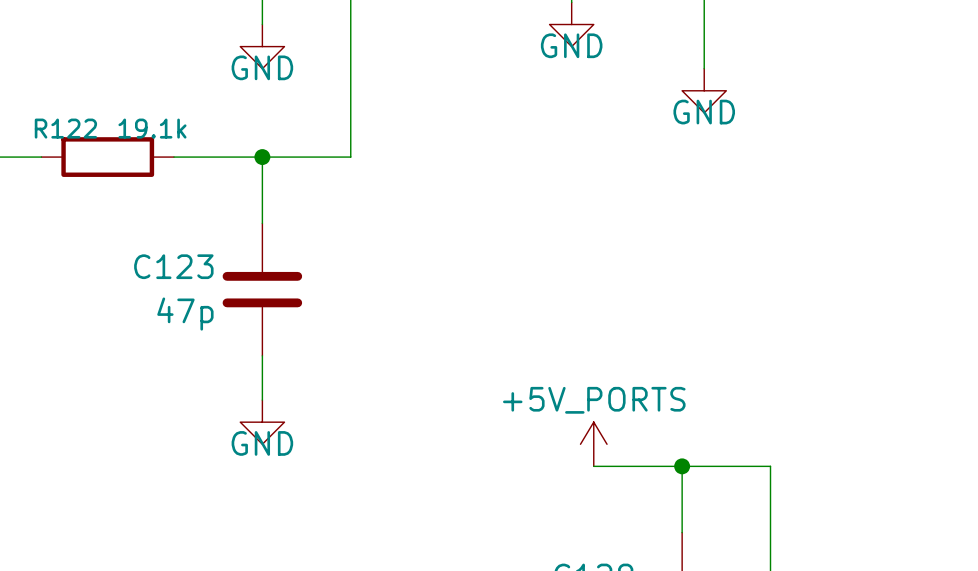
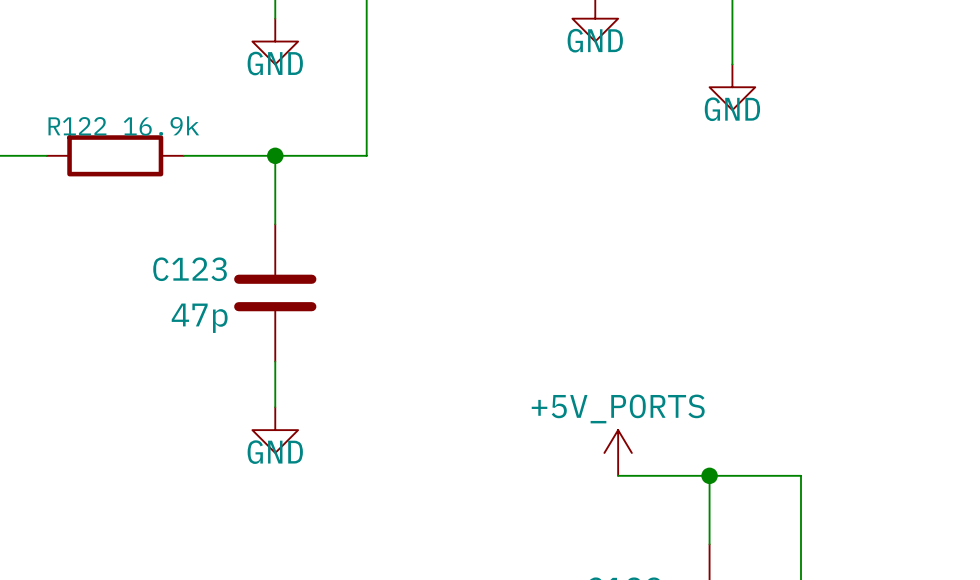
R122 value: 19.1k (152, 128) -> 16.9k (161, 125)

